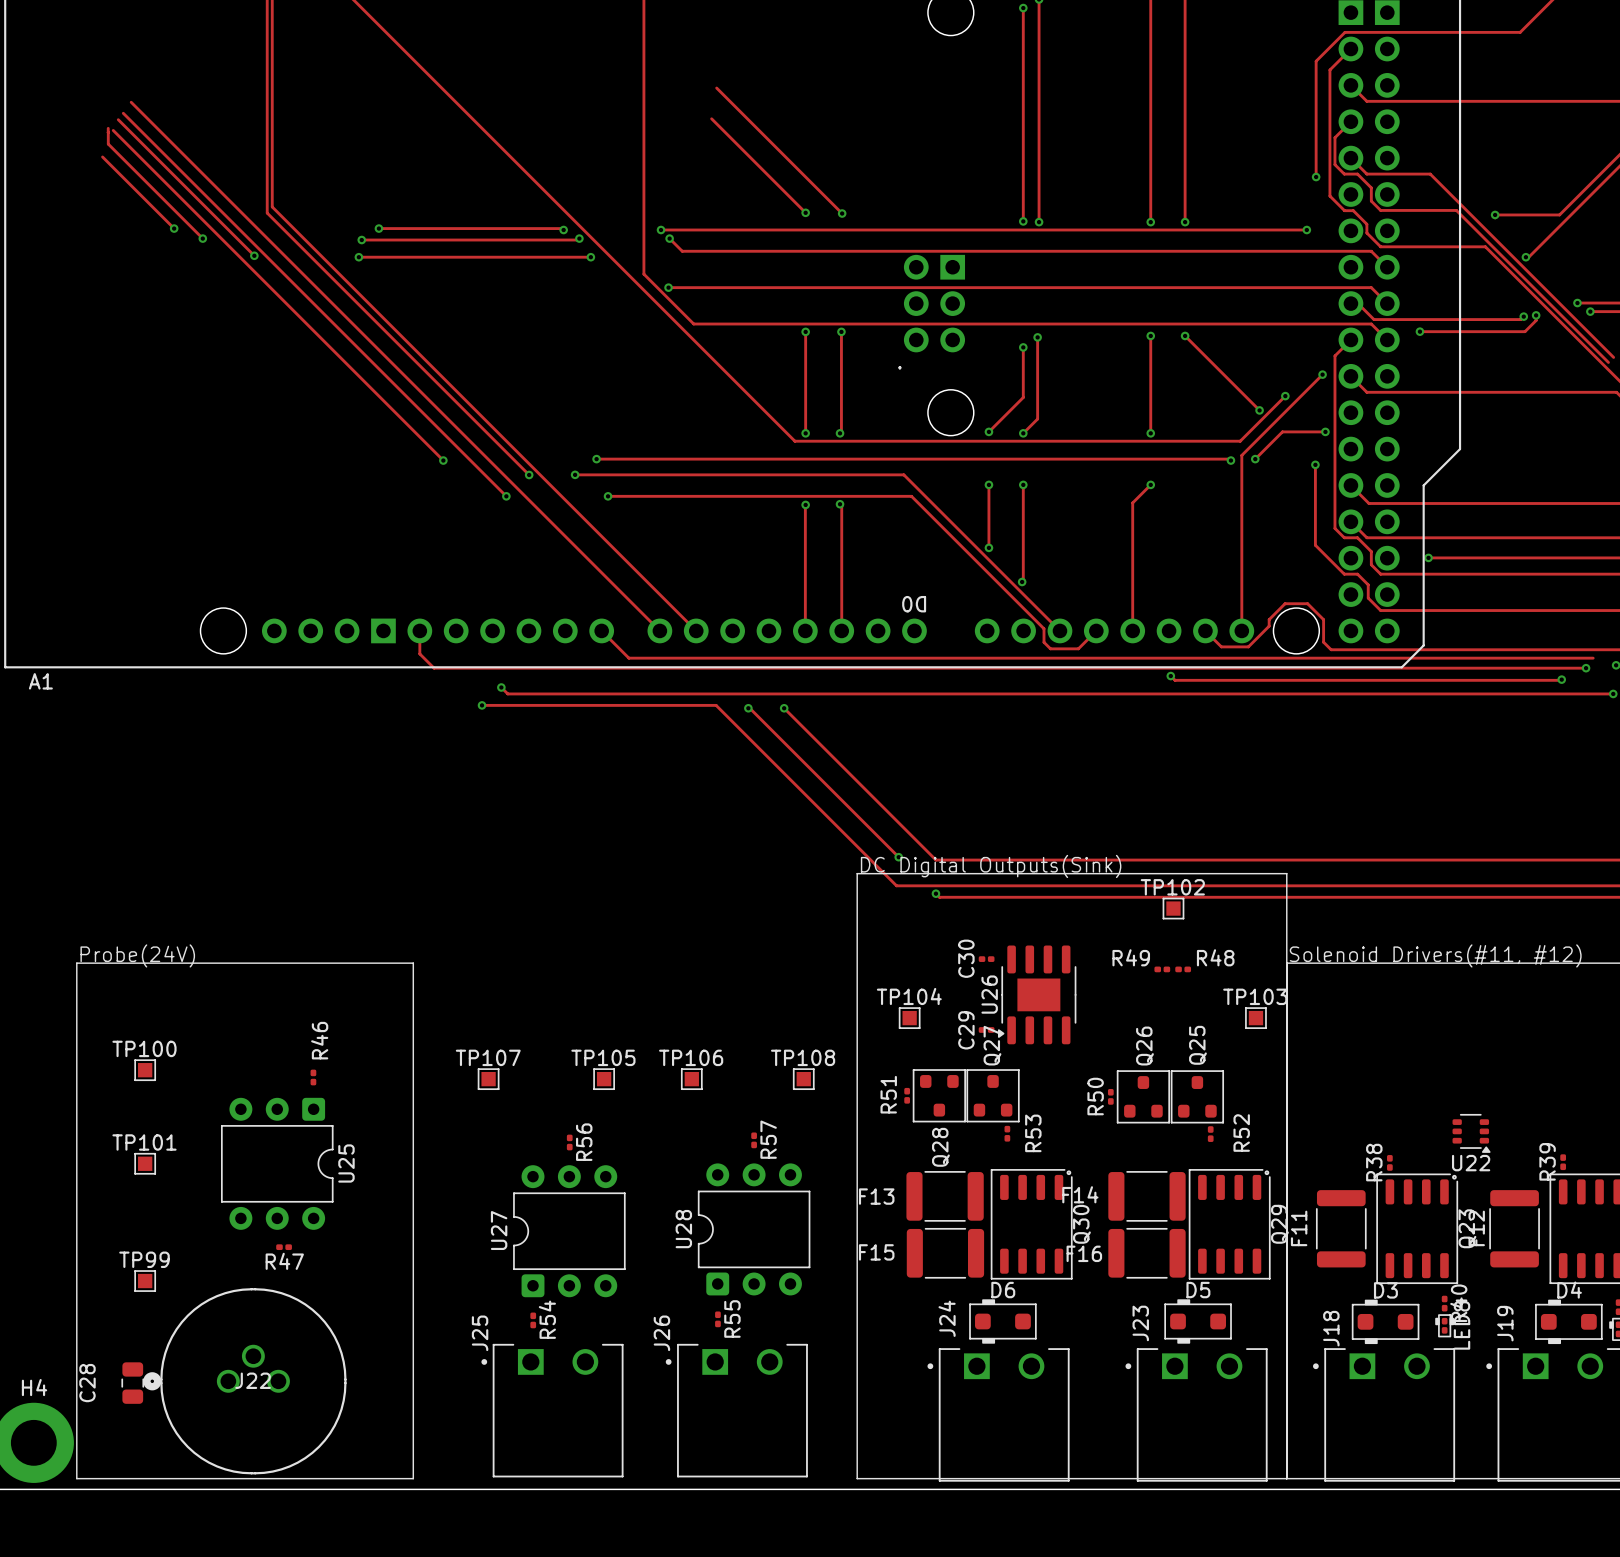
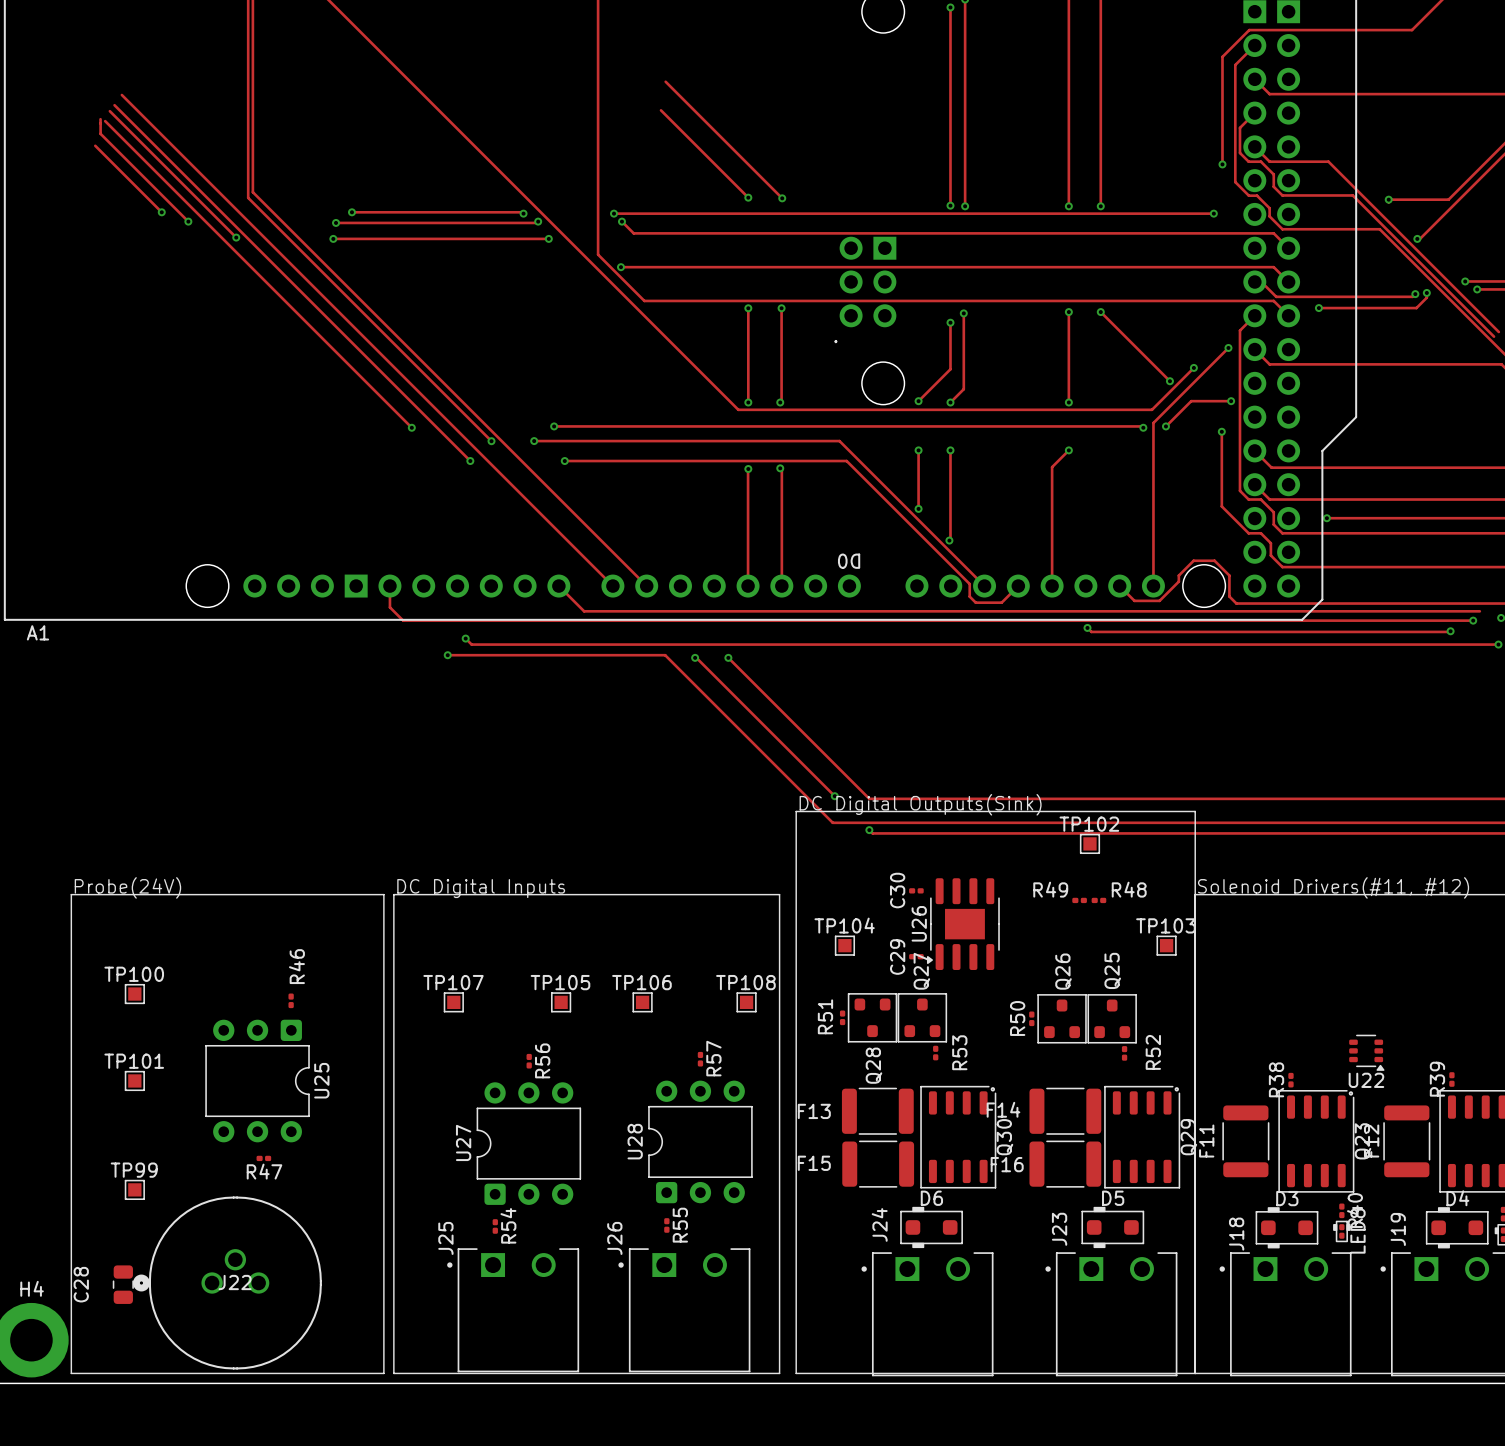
text: none -> DC Digital Inputs (481, 888)
line: none -> (393, 894) (779, 894) (779, 1373) (393, 1373) (393, 894)

